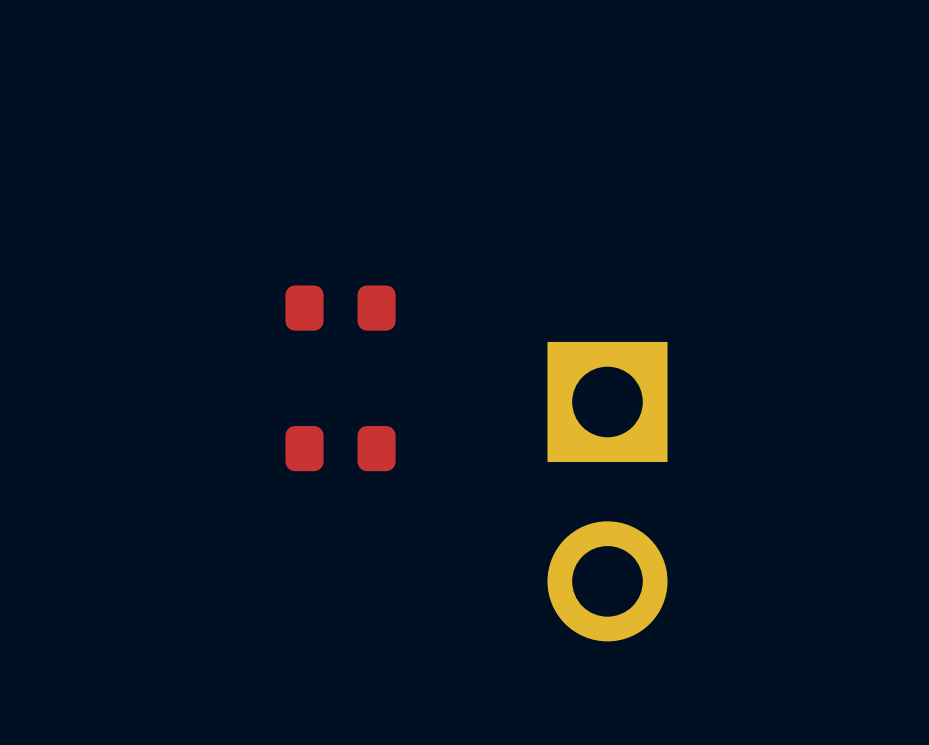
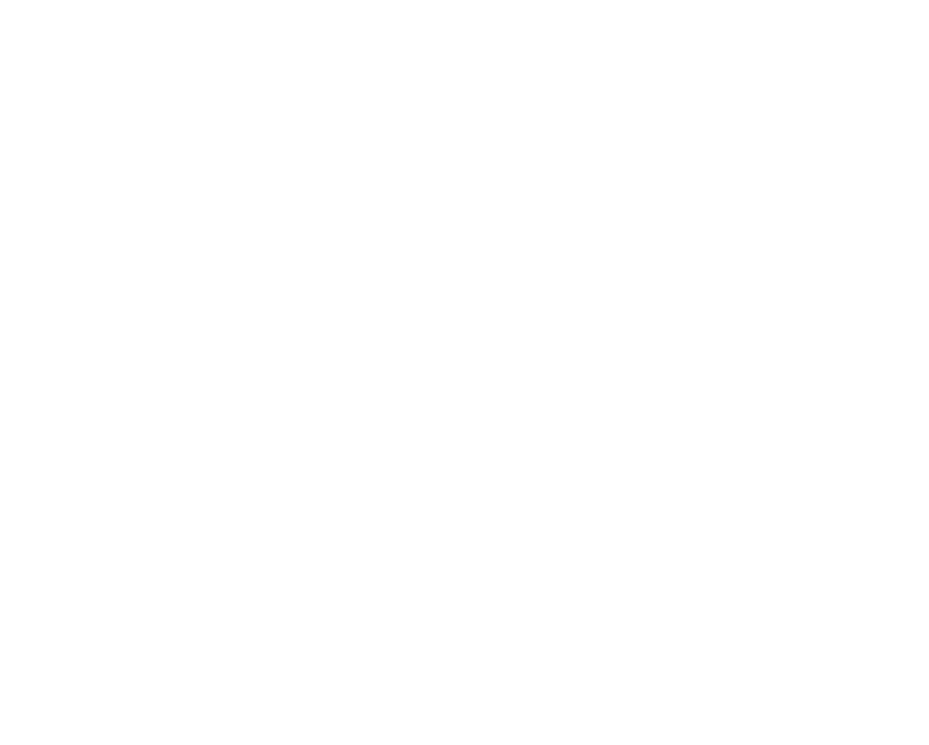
part: (340, 308) -> none
part: (340, 448) -> none
part: (607, 491) -> none

